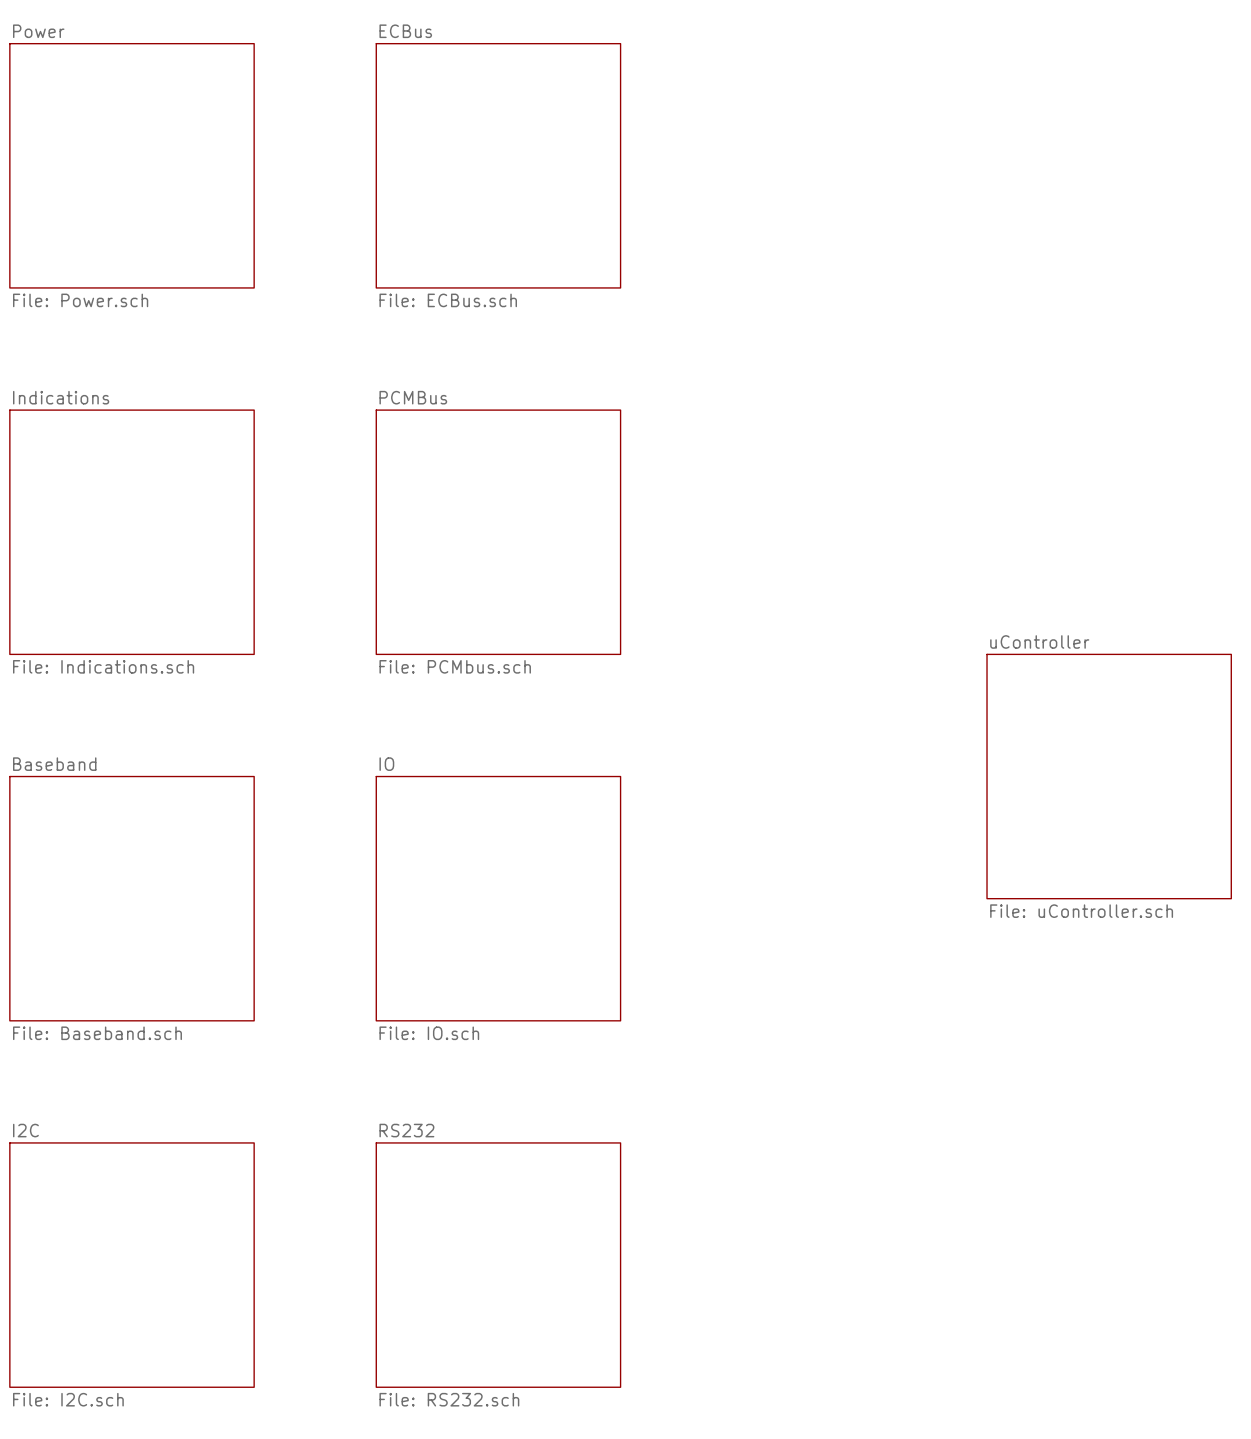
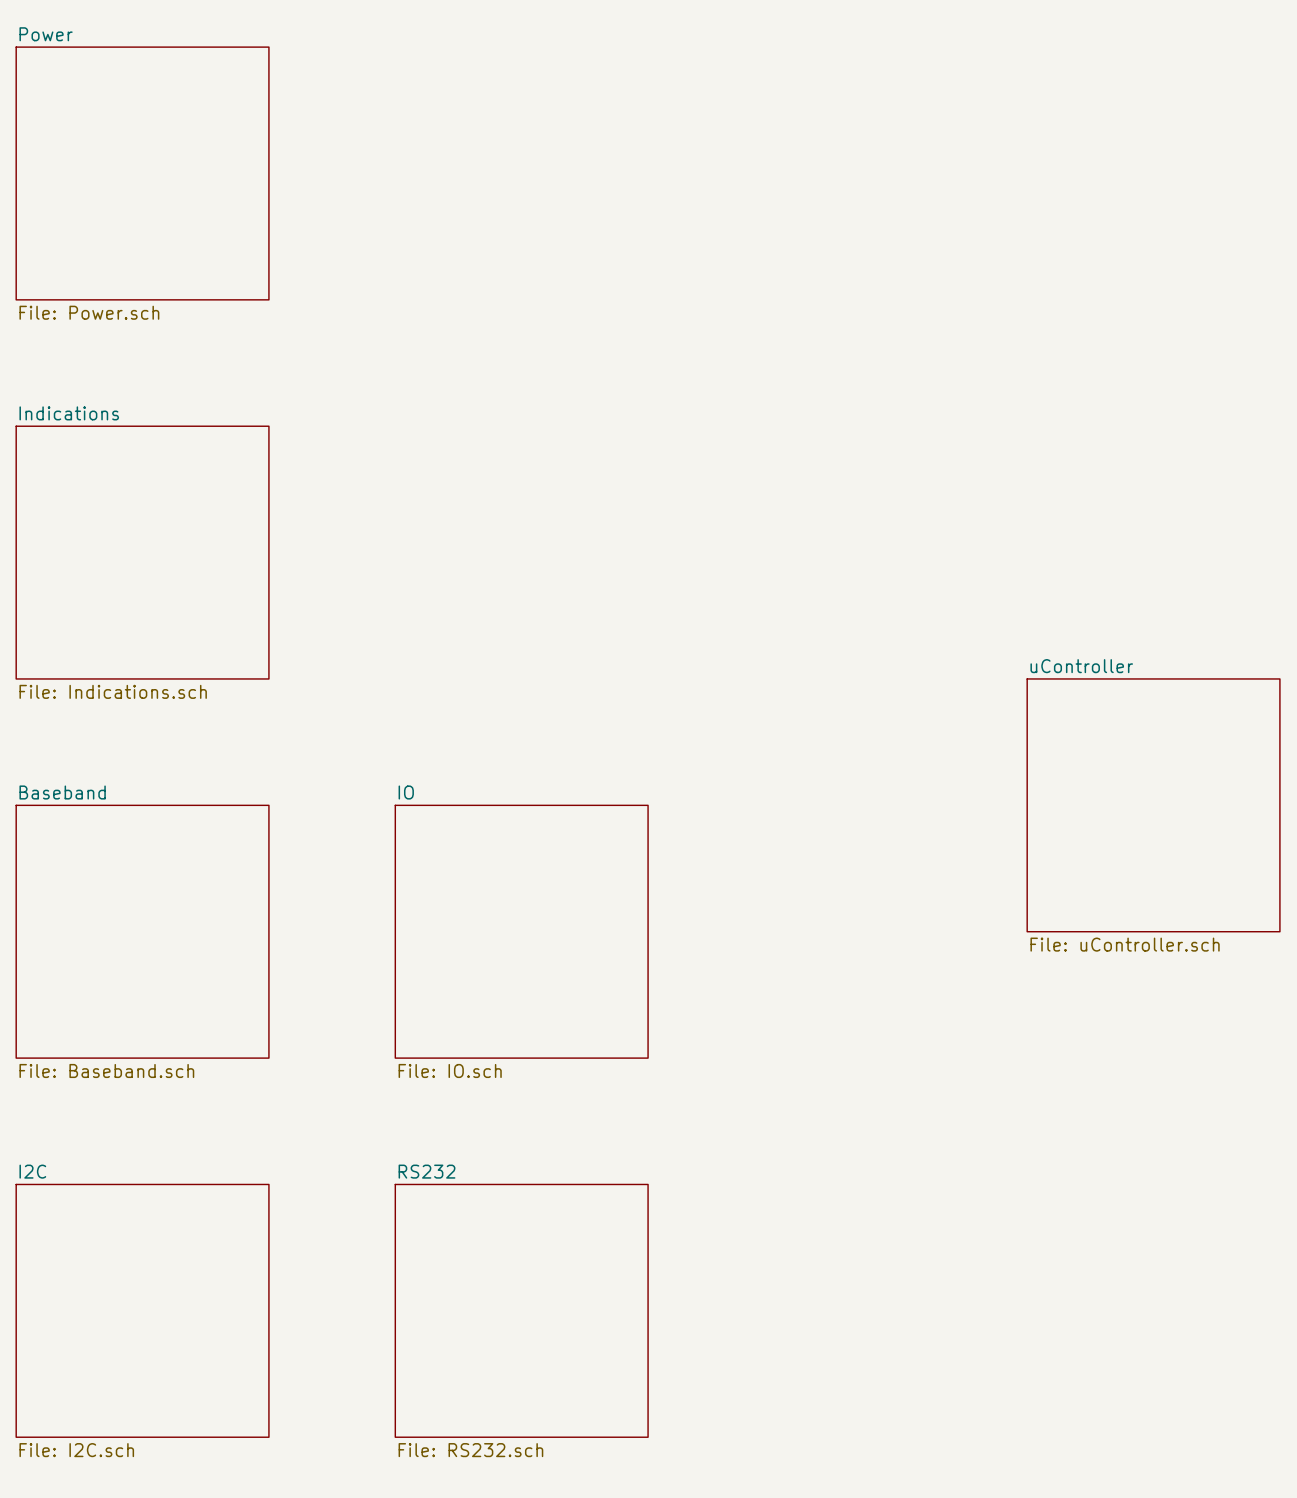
sheet ECBus: File: ECBus.sch (498, 165) -> none
sheet PCMBus: File: PCMbus.sch (498, 532) -> none

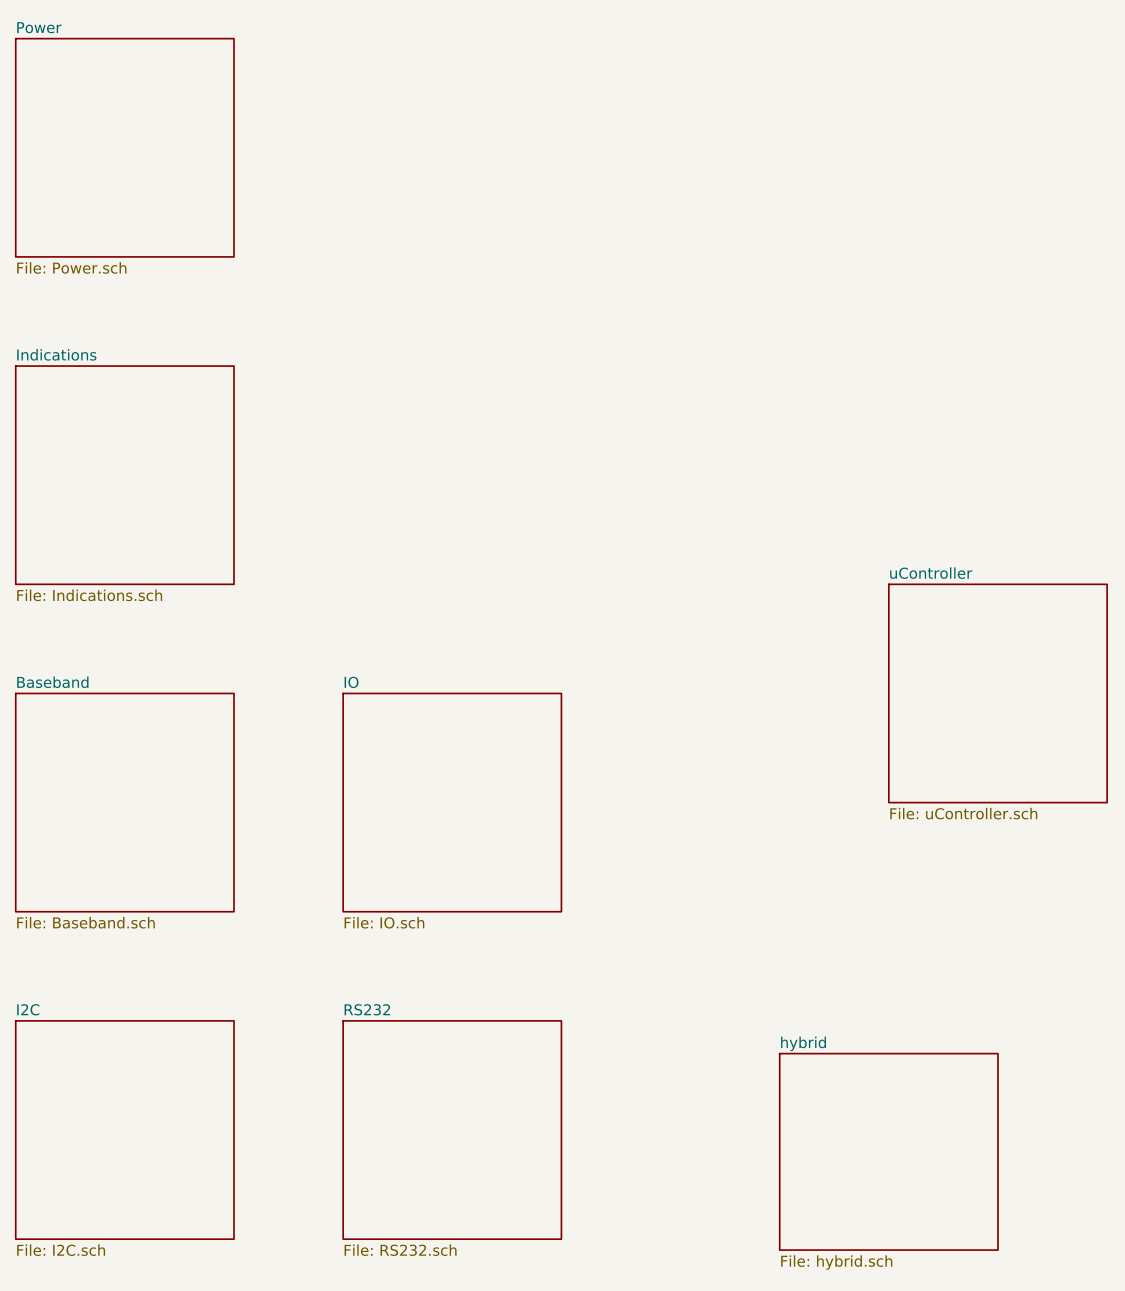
sheet hybrid: none -> File: hybrid.sch (888, 1151)

